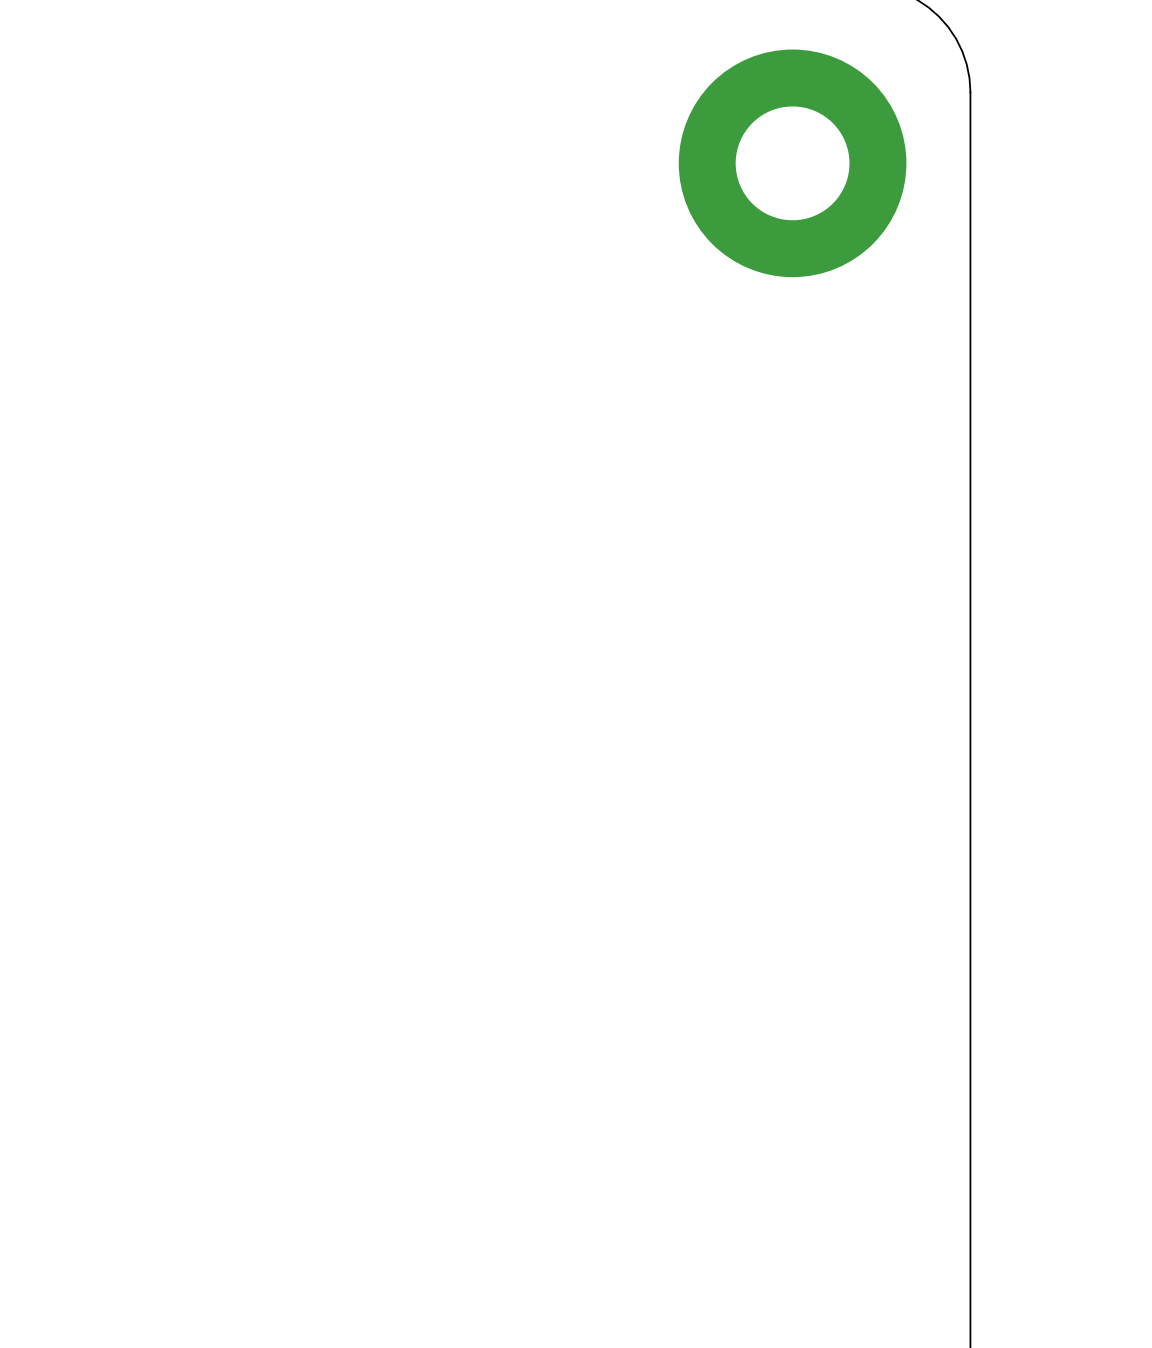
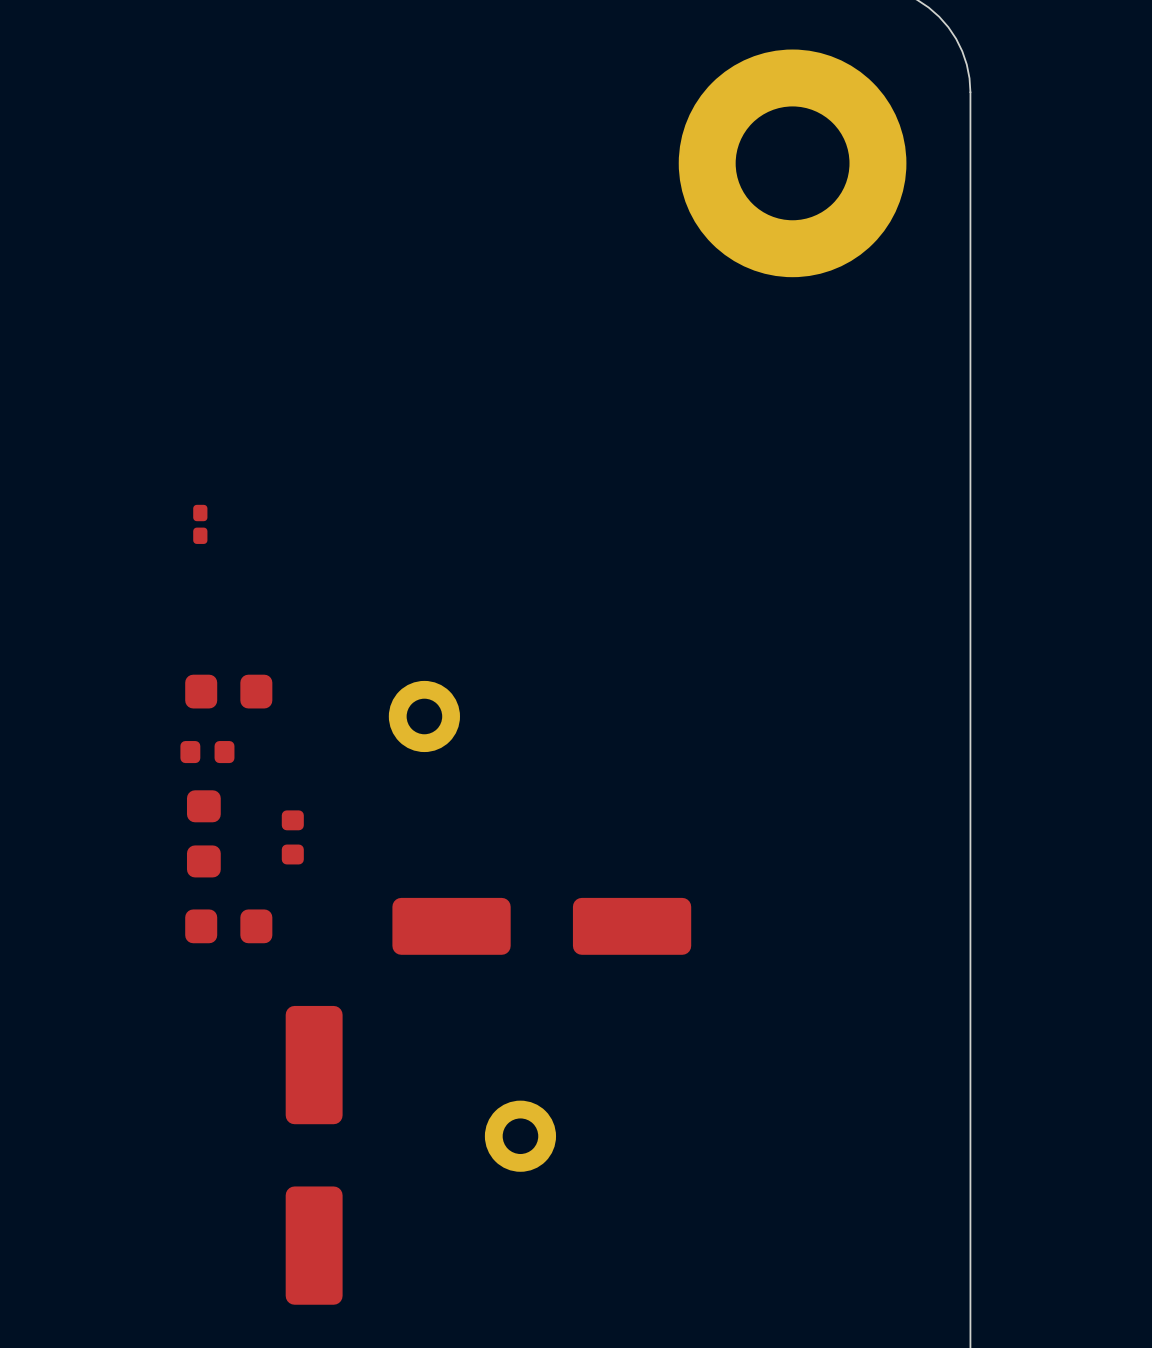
part: none -> (200, 524)
part: none -> (228, 691)
part: none -> (424, 716)
part: none -> (207, 752)
part: none -> (203, 833)
part: none -> (292, 837)
part: none -> (228, 926)
part: none -> (541, 926)
part: none -> (520, 1136)
part: none -> (314, 1155)

